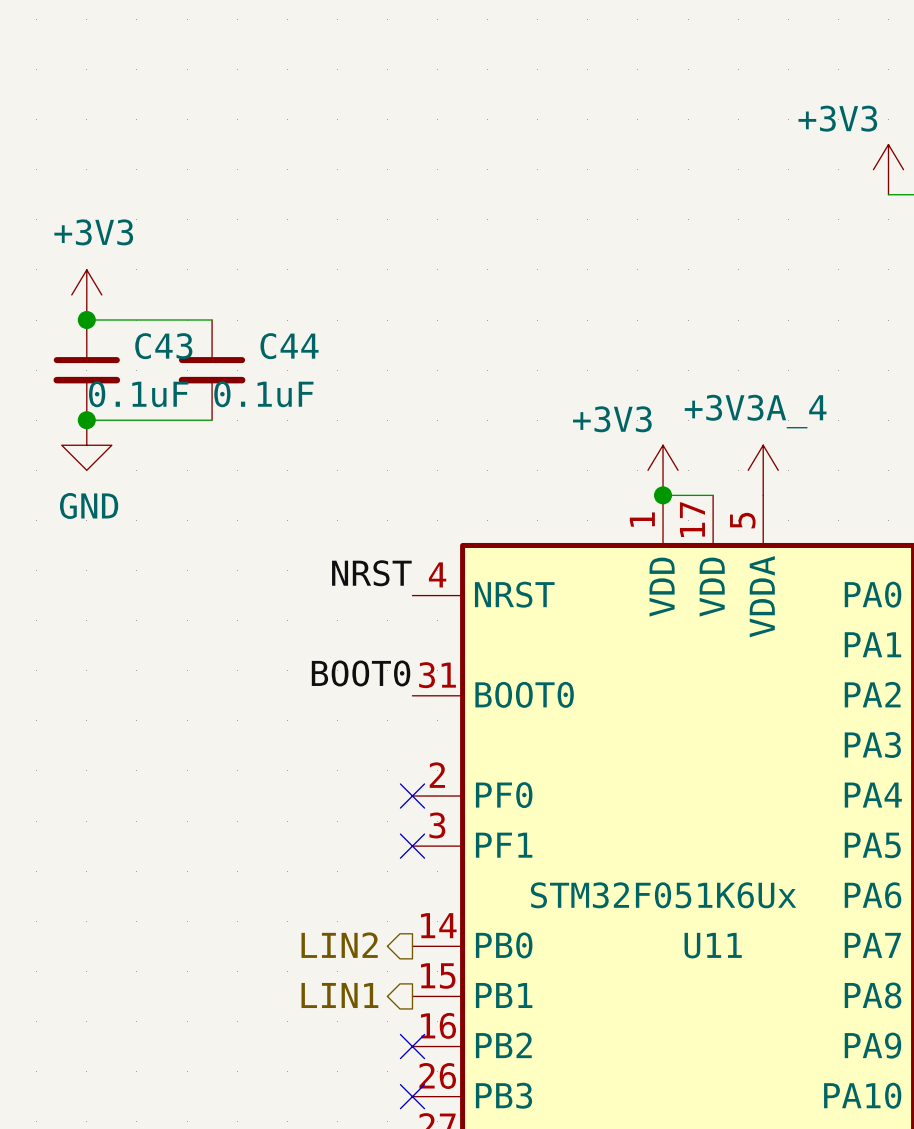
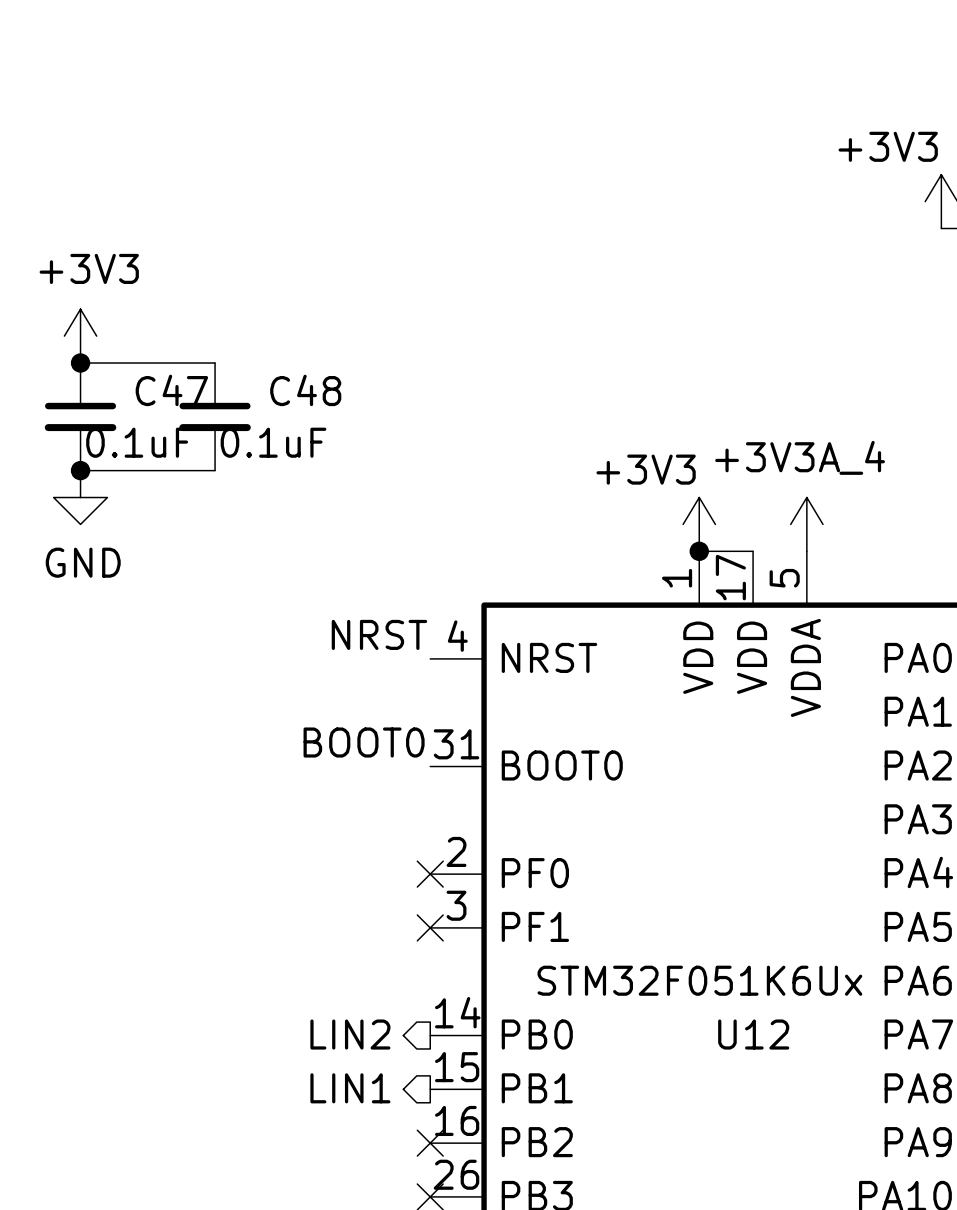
C43 name: C43 (163, 346) -> C47 (171, 390)
C44 name: C44 (289, 346) -> C48 (305, 390)
U11 name: U11 (713, 945) -> U12 (753, 1034)

